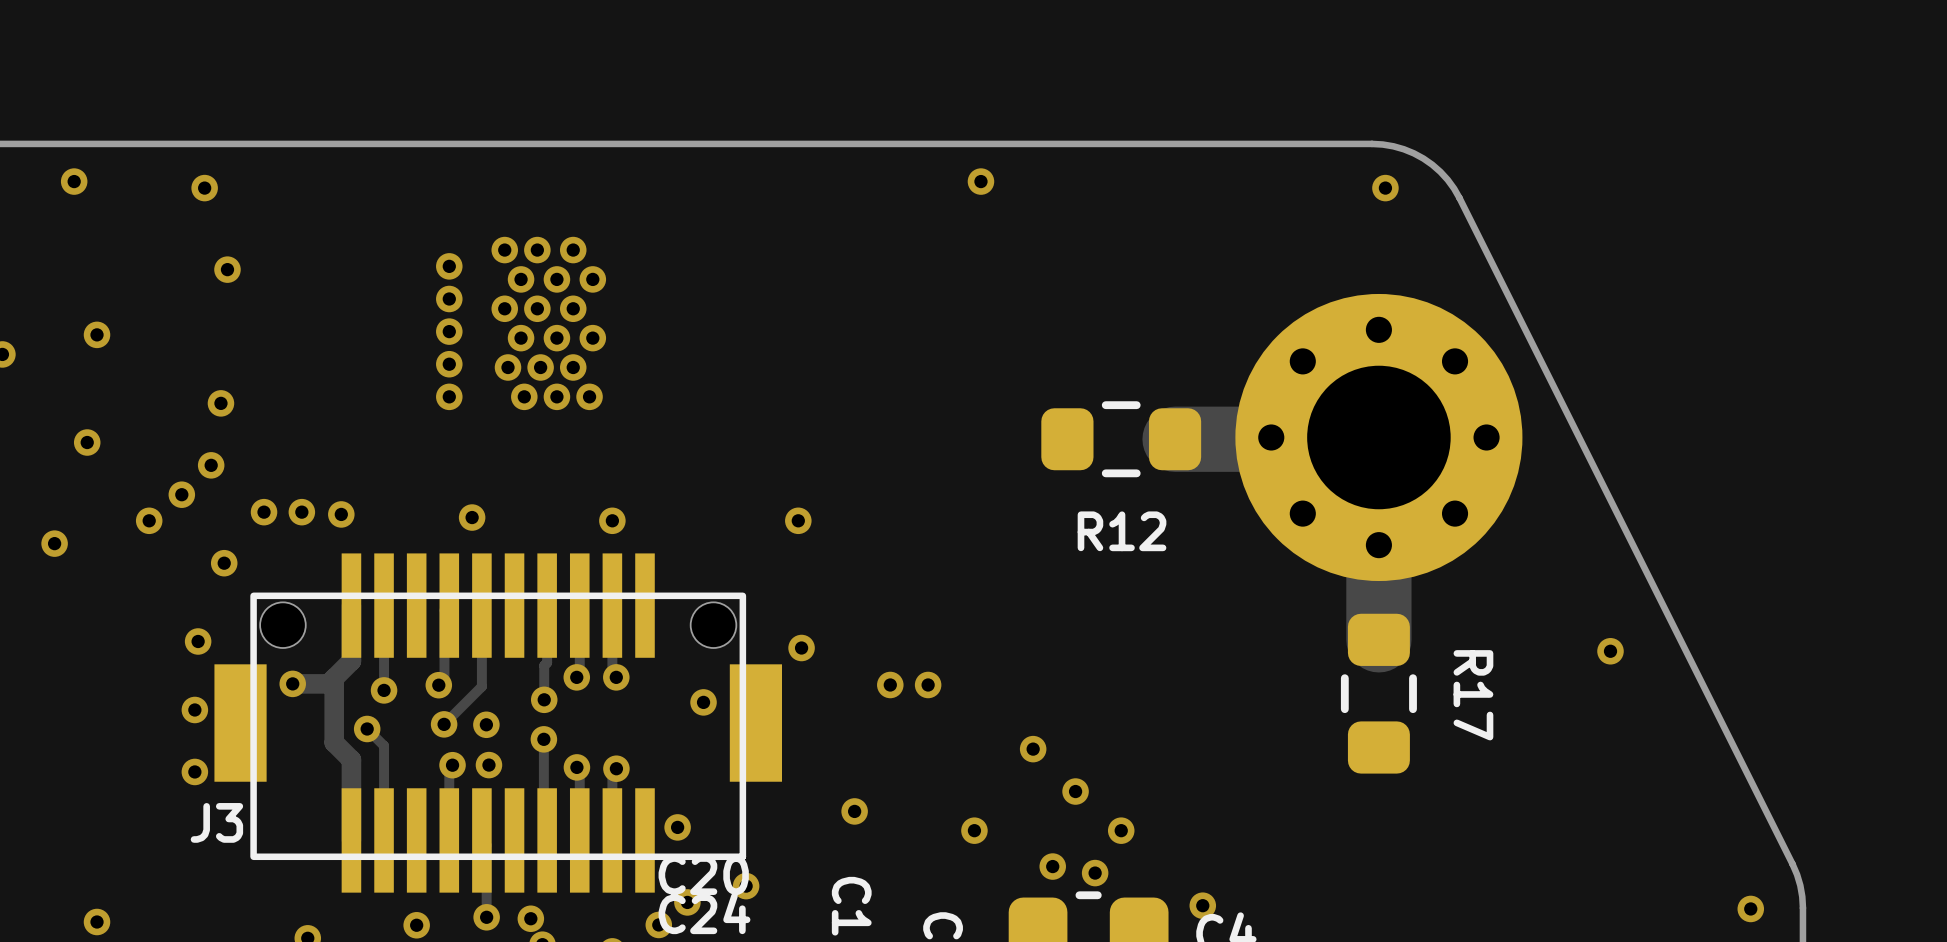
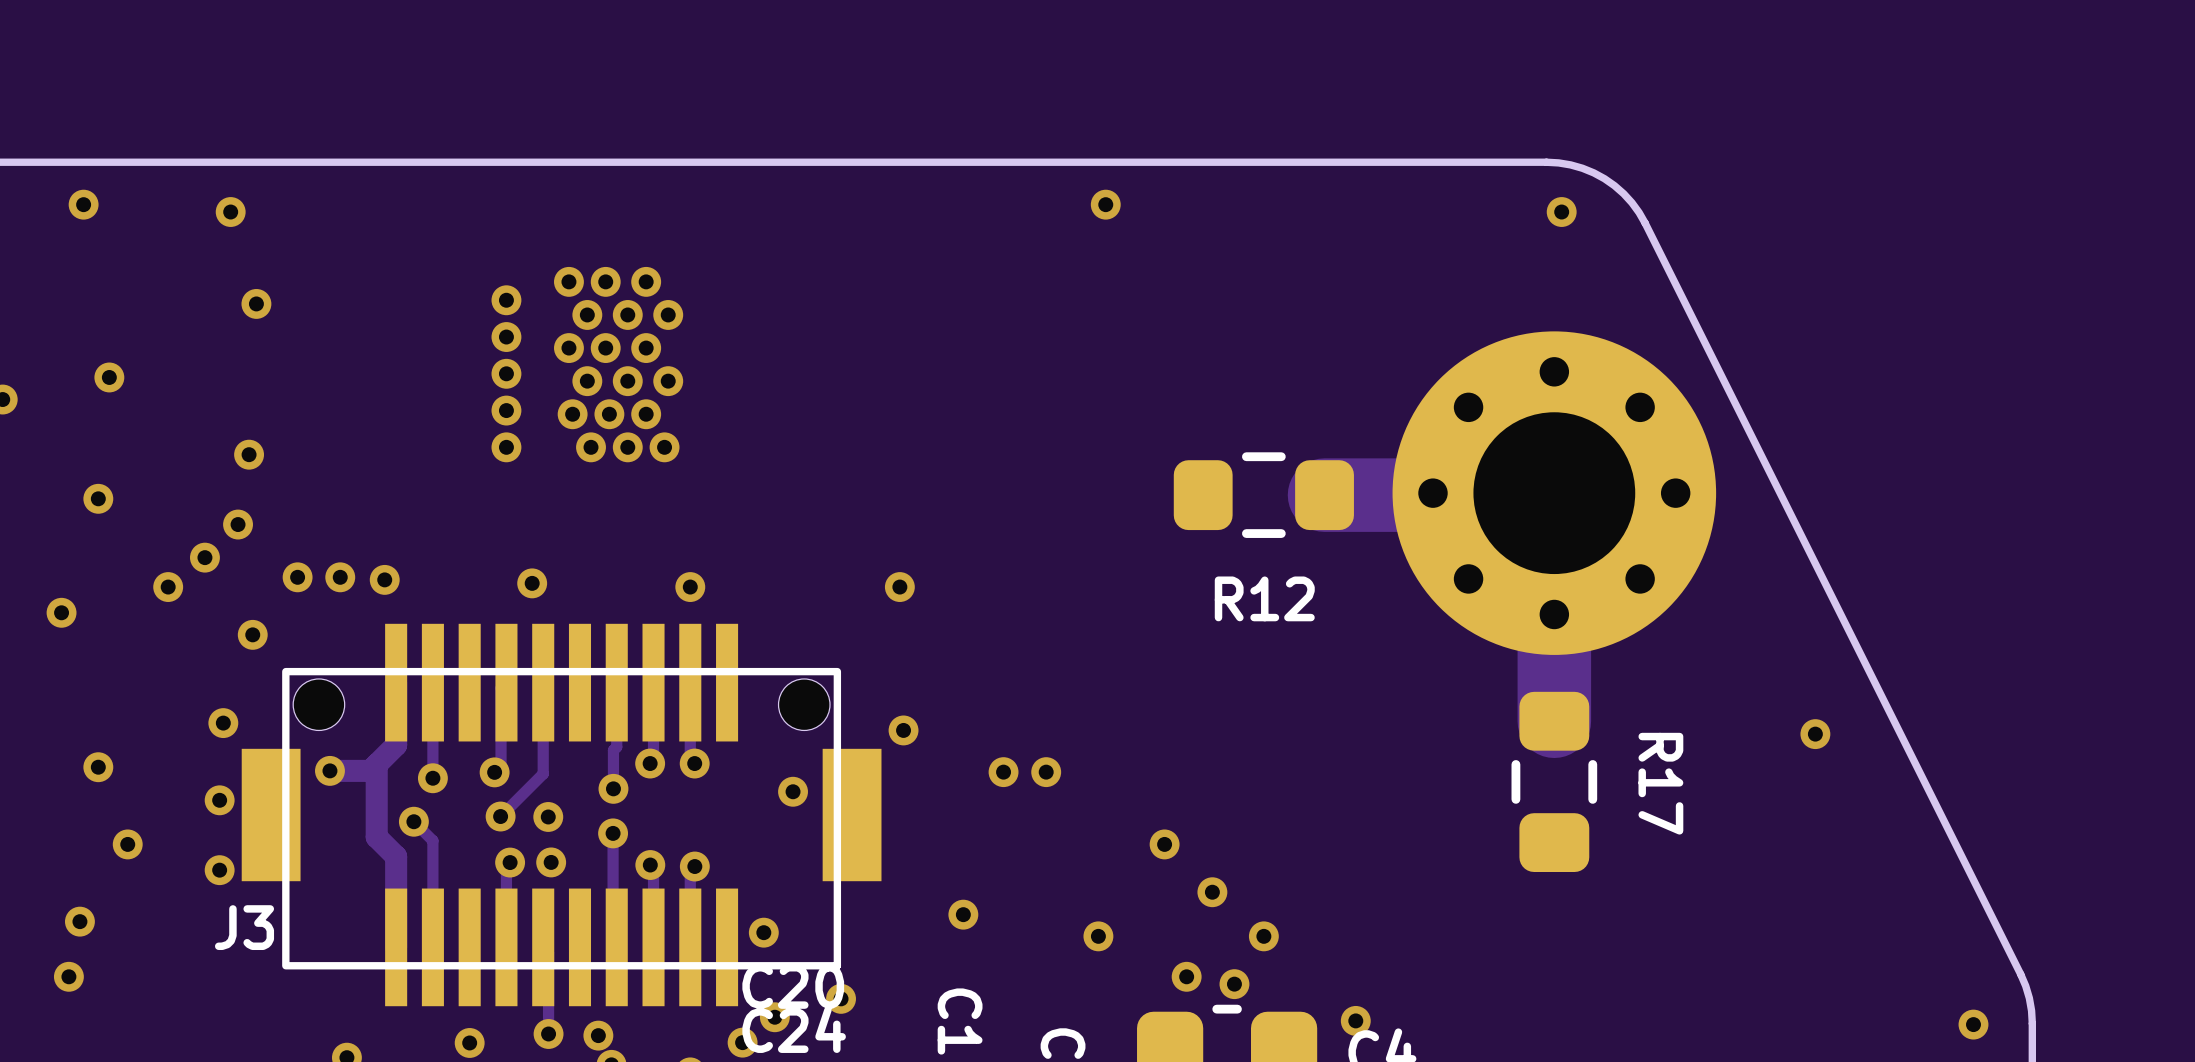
via: none -> (98, 767)
via: none -> (127, 844)
via: none -> (79, 921)
via: none -> (68, 976)
via: (97, 922) -> none

